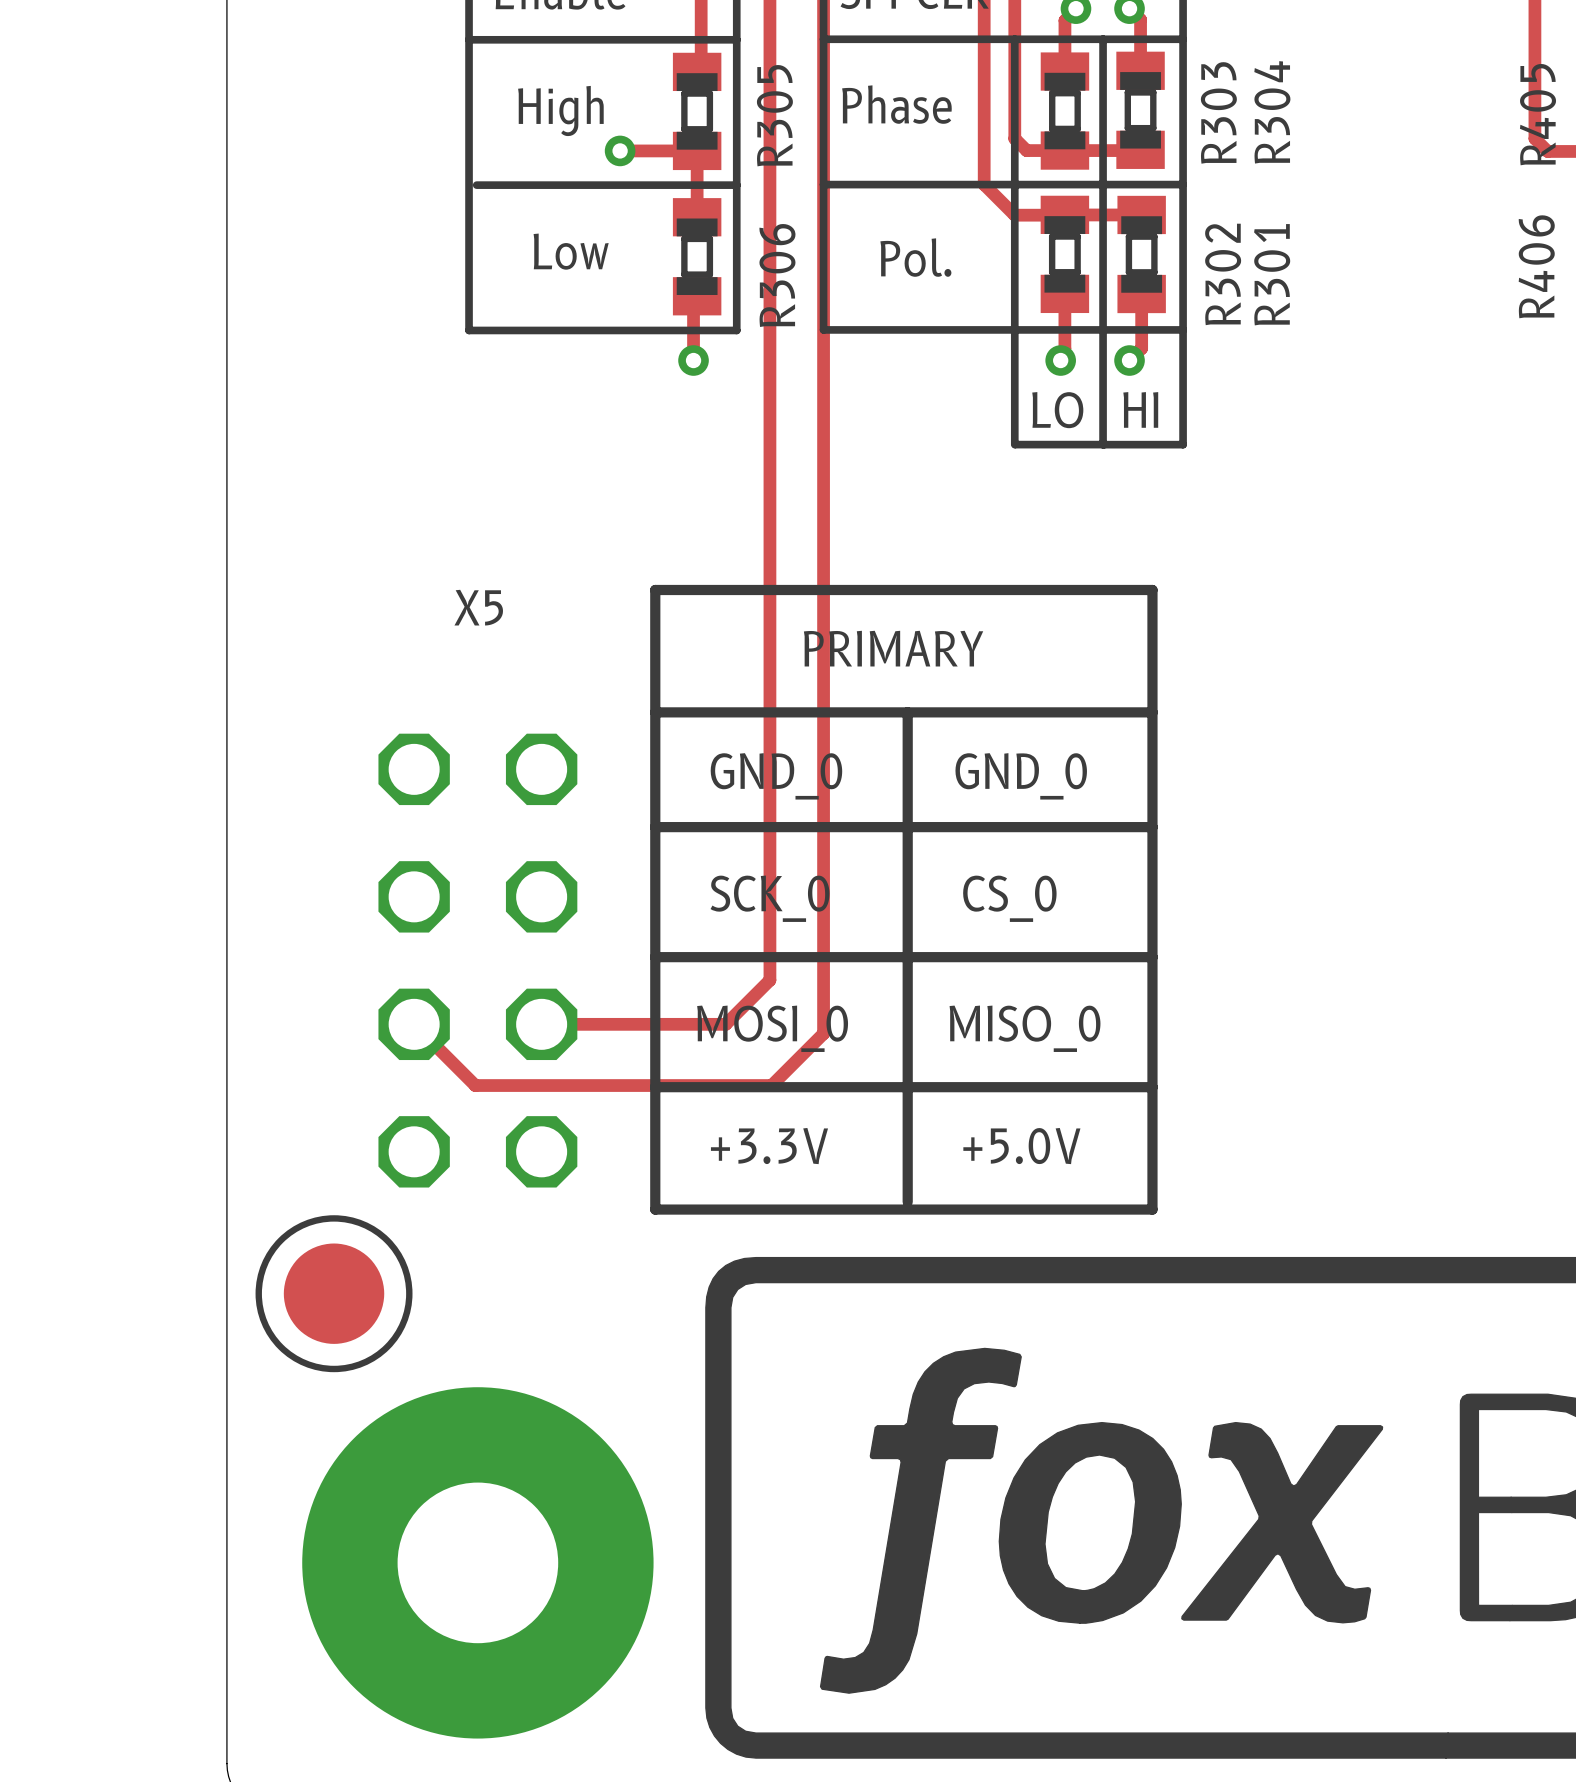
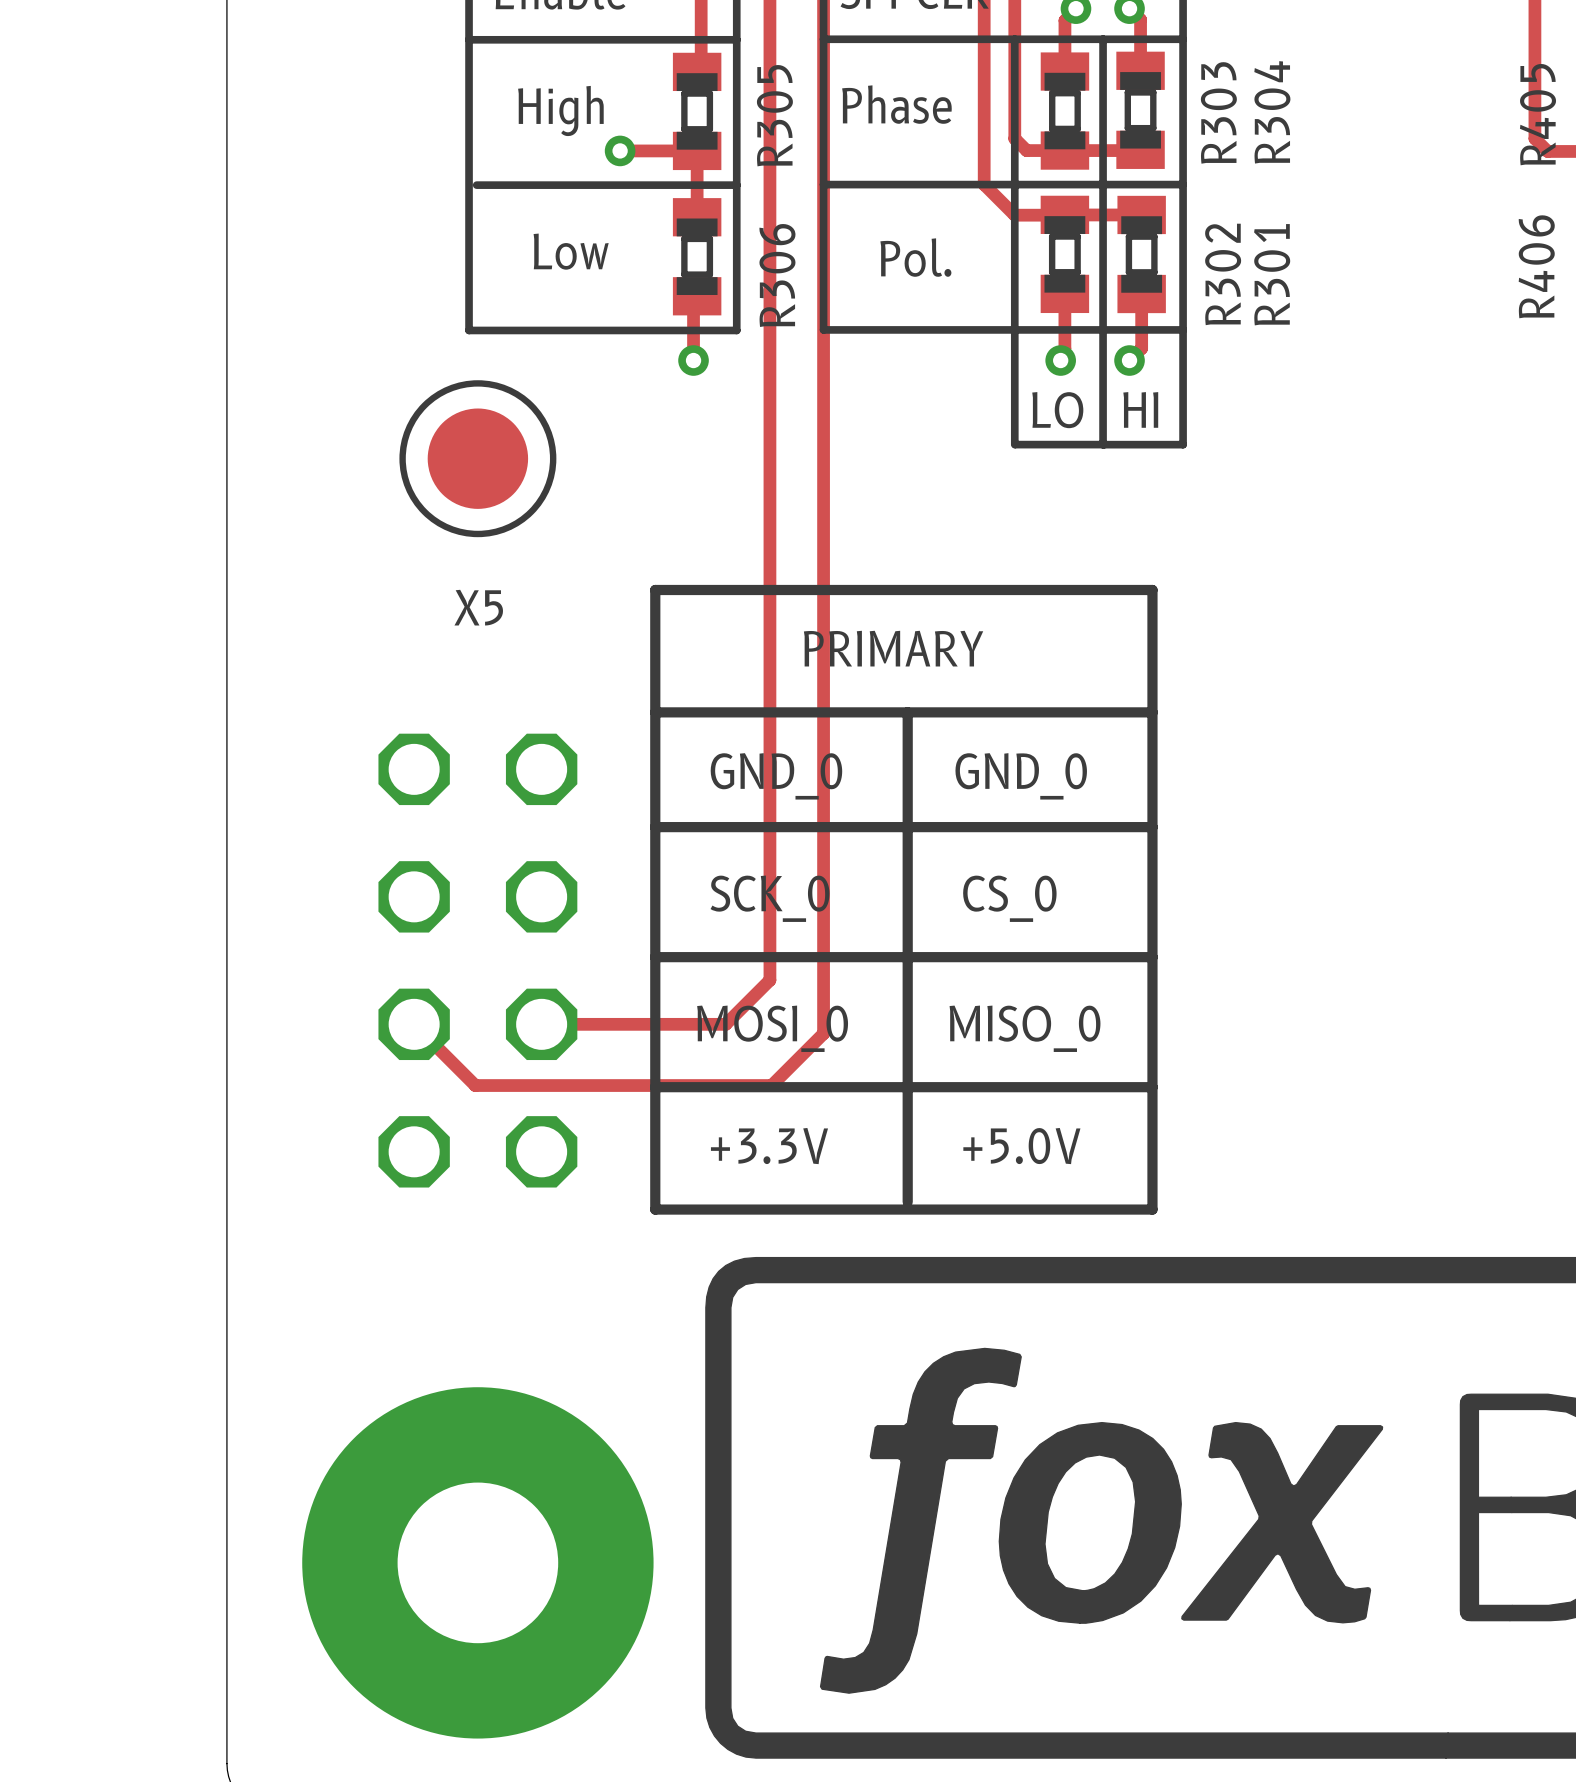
drawing position: (334, 1293) -> (477, 458)

